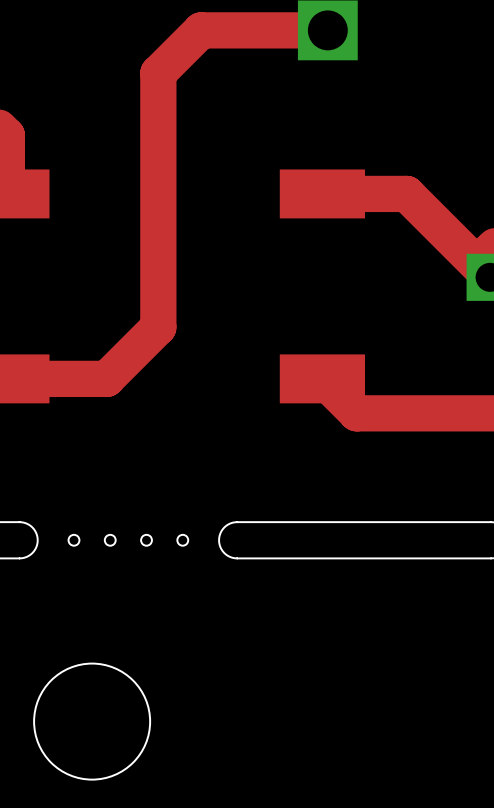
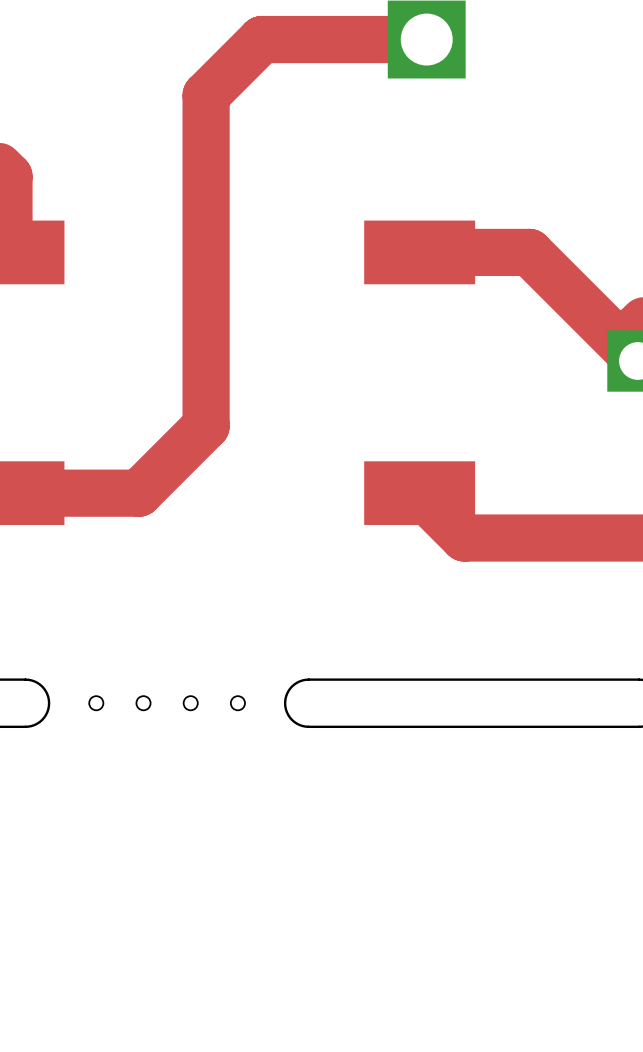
round board edge: [33, 662, 152, 781] -> none

